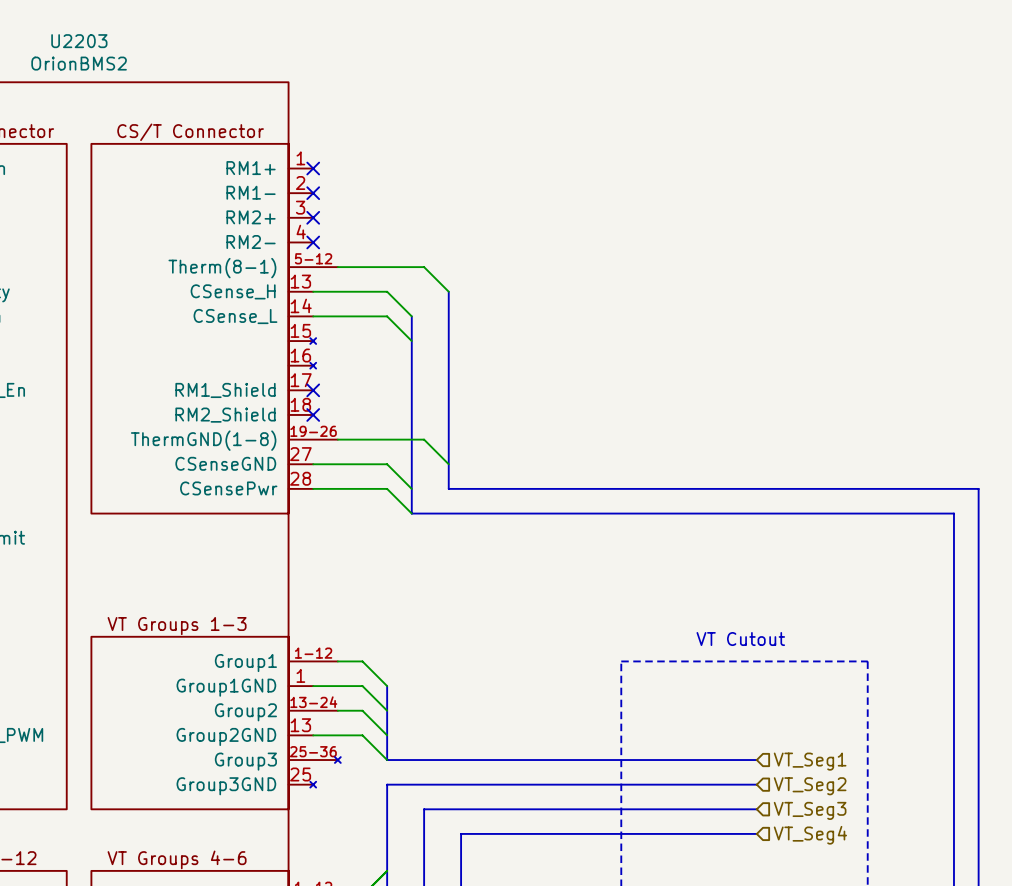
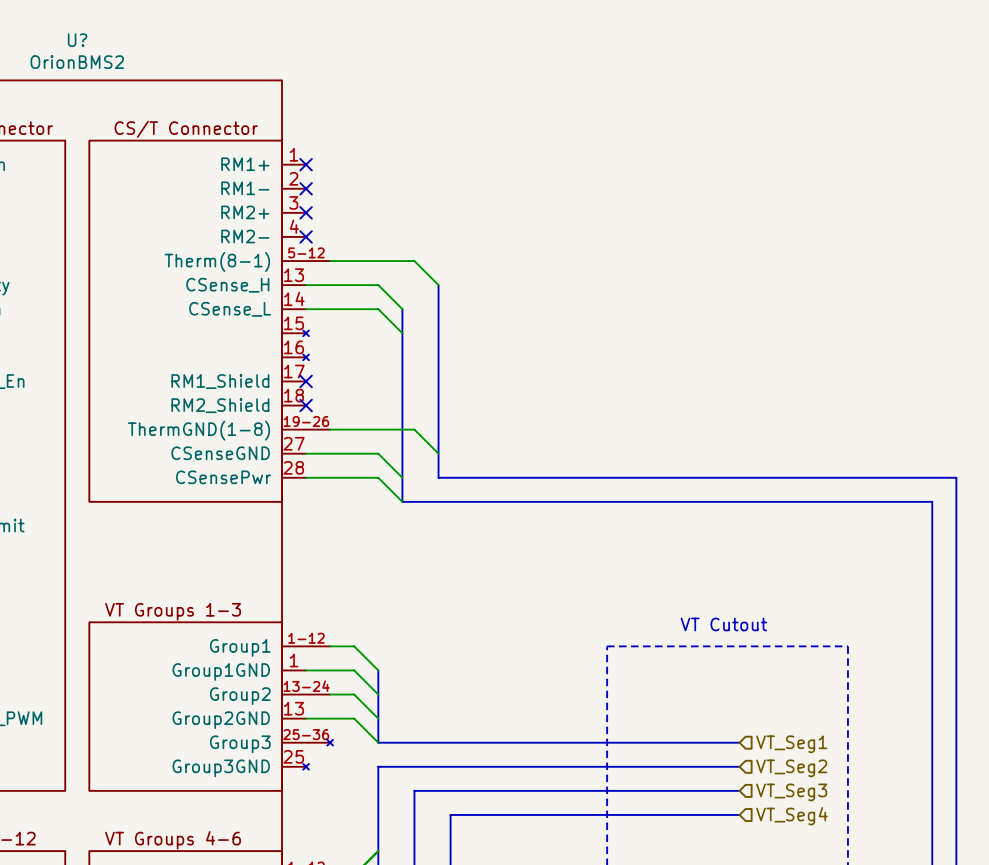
U2203 name: U2203 (79, 41) -> U? (77, 40)

